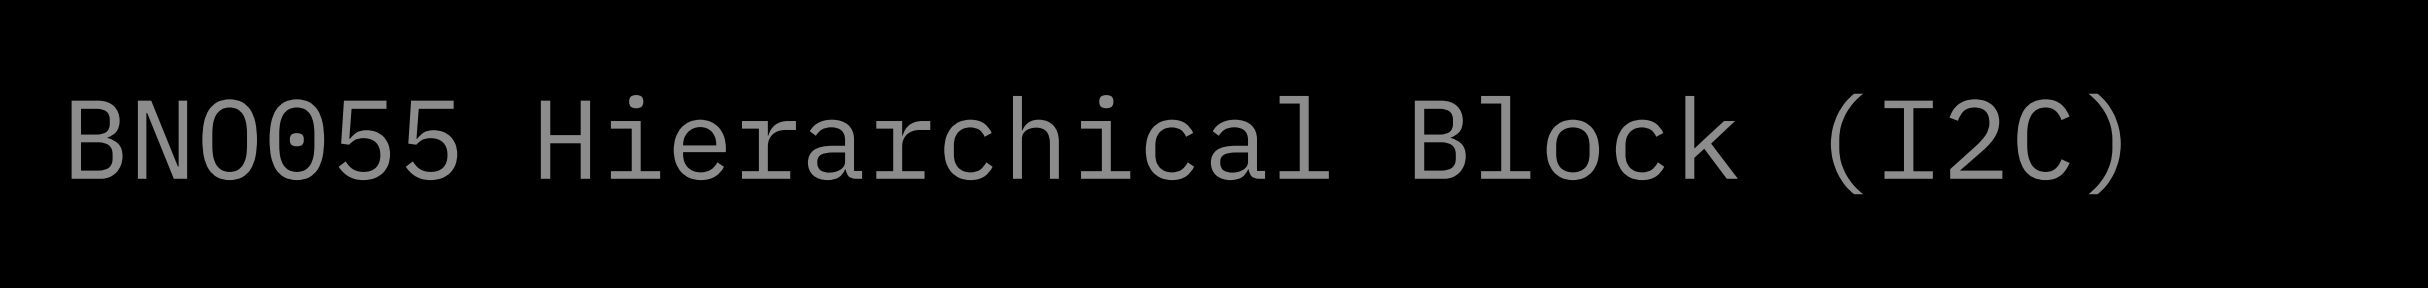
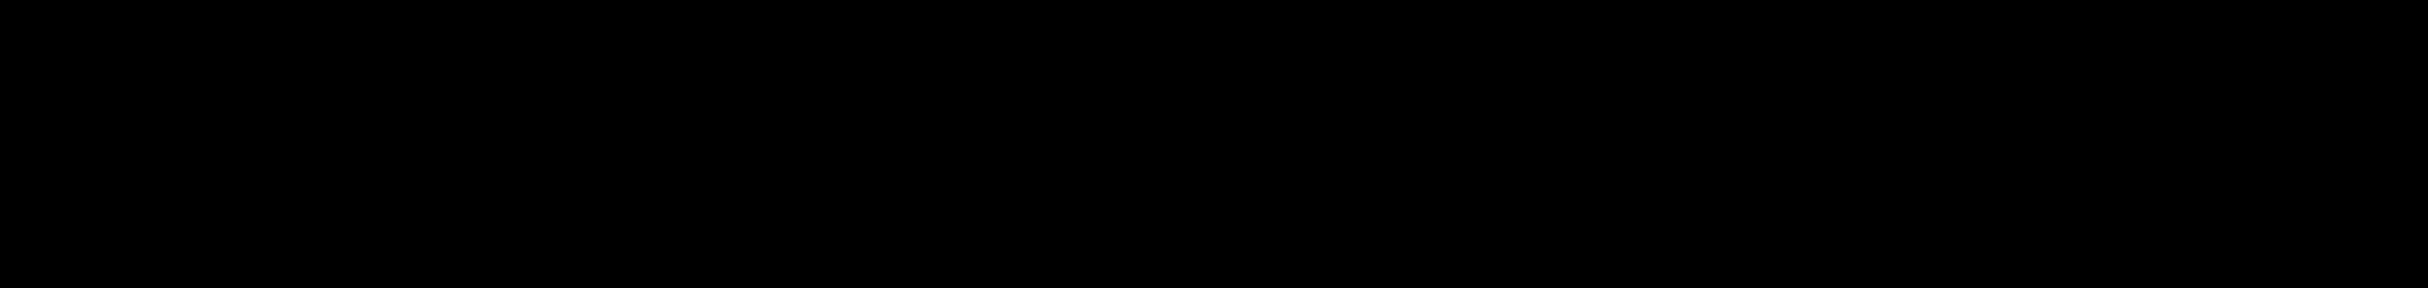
text: BNO055 Hierarchical Block (I2C) (1096, 143) -> none

